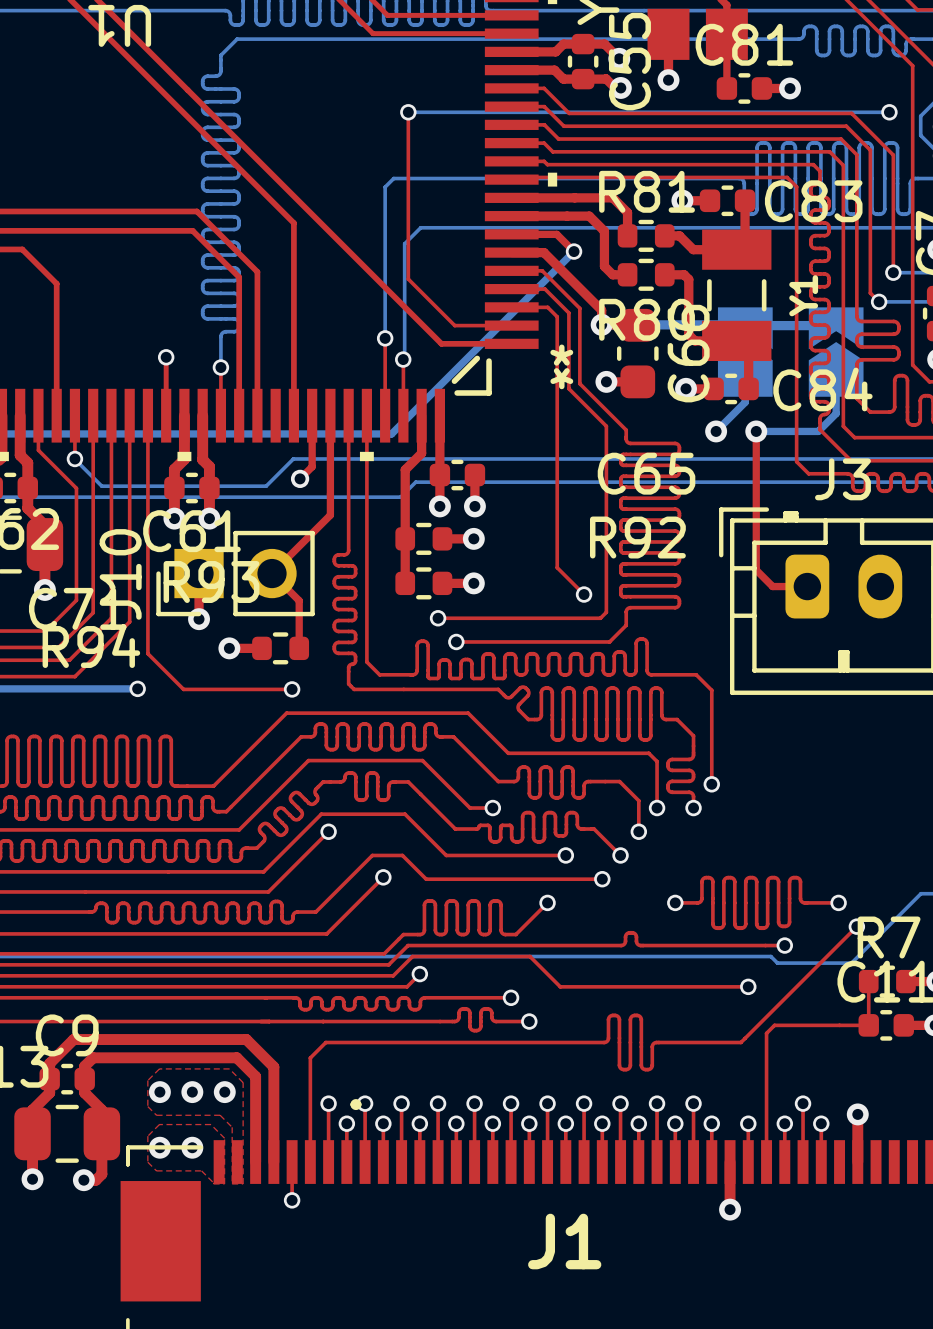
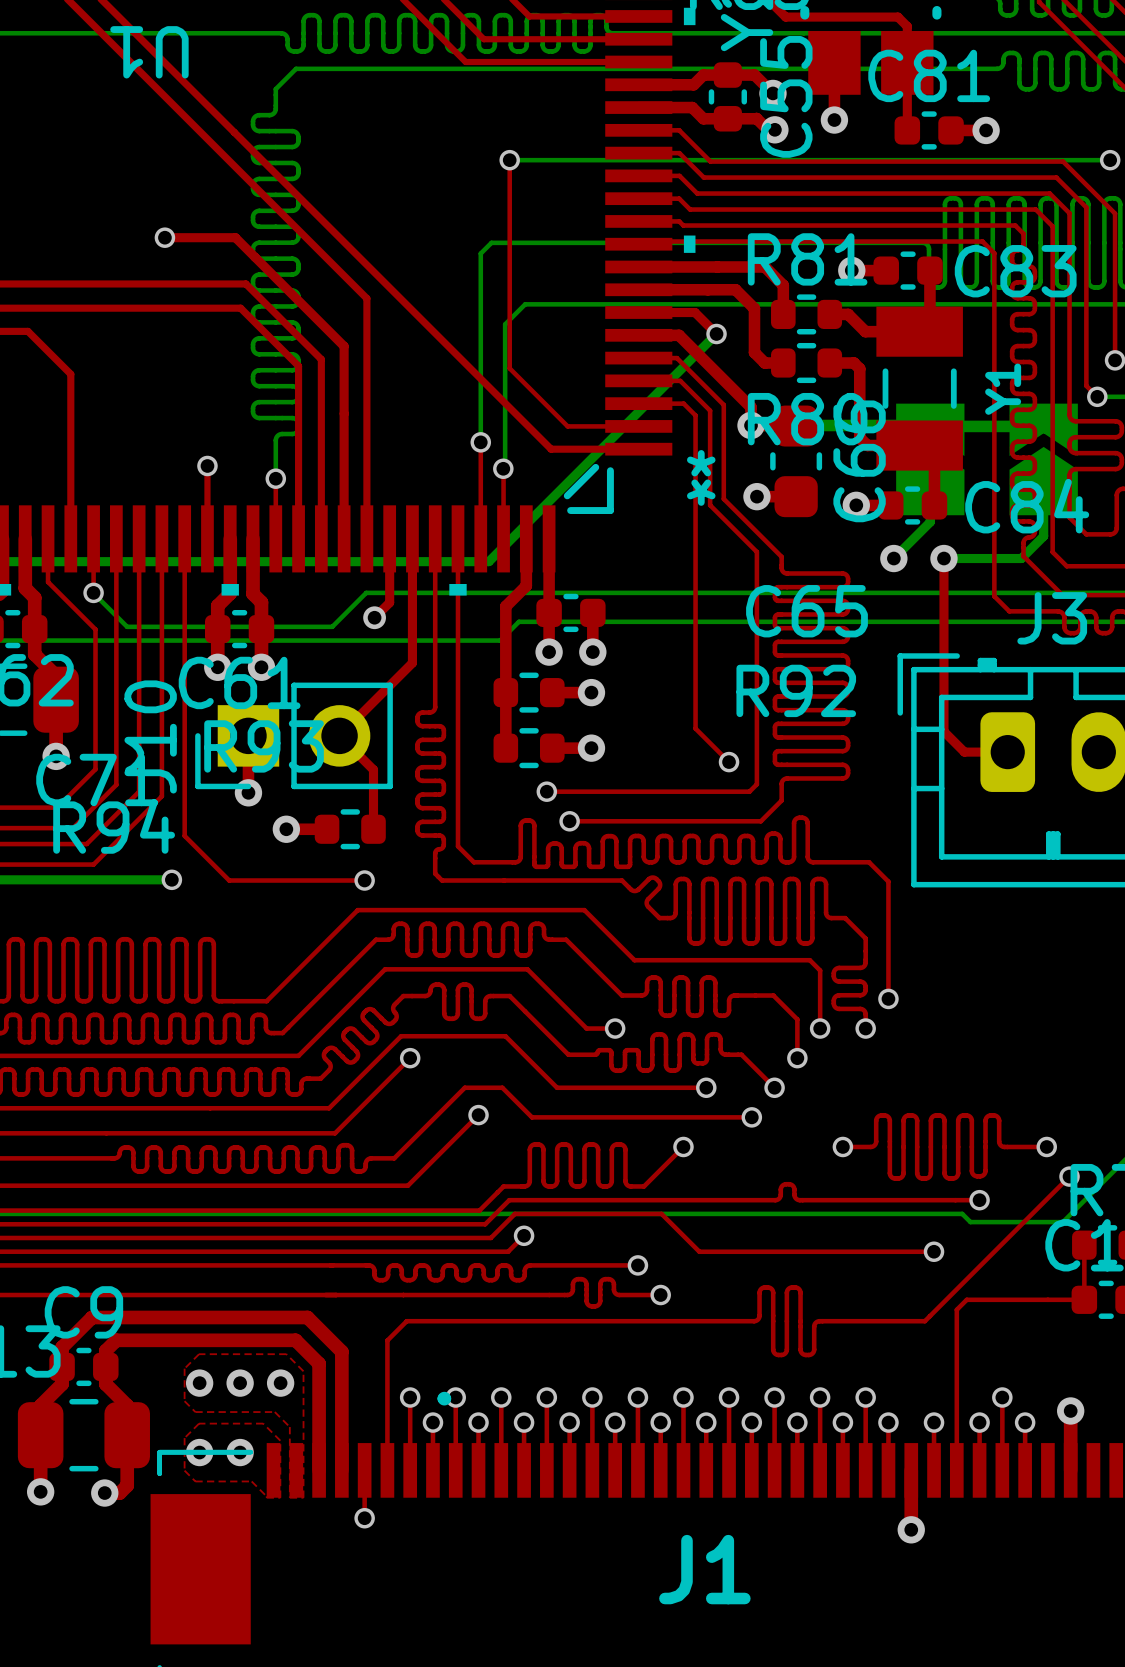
top track: none -> (164, 237) (235, 237) (344, 346) (344, 538)
via: none -> (164, 237)

